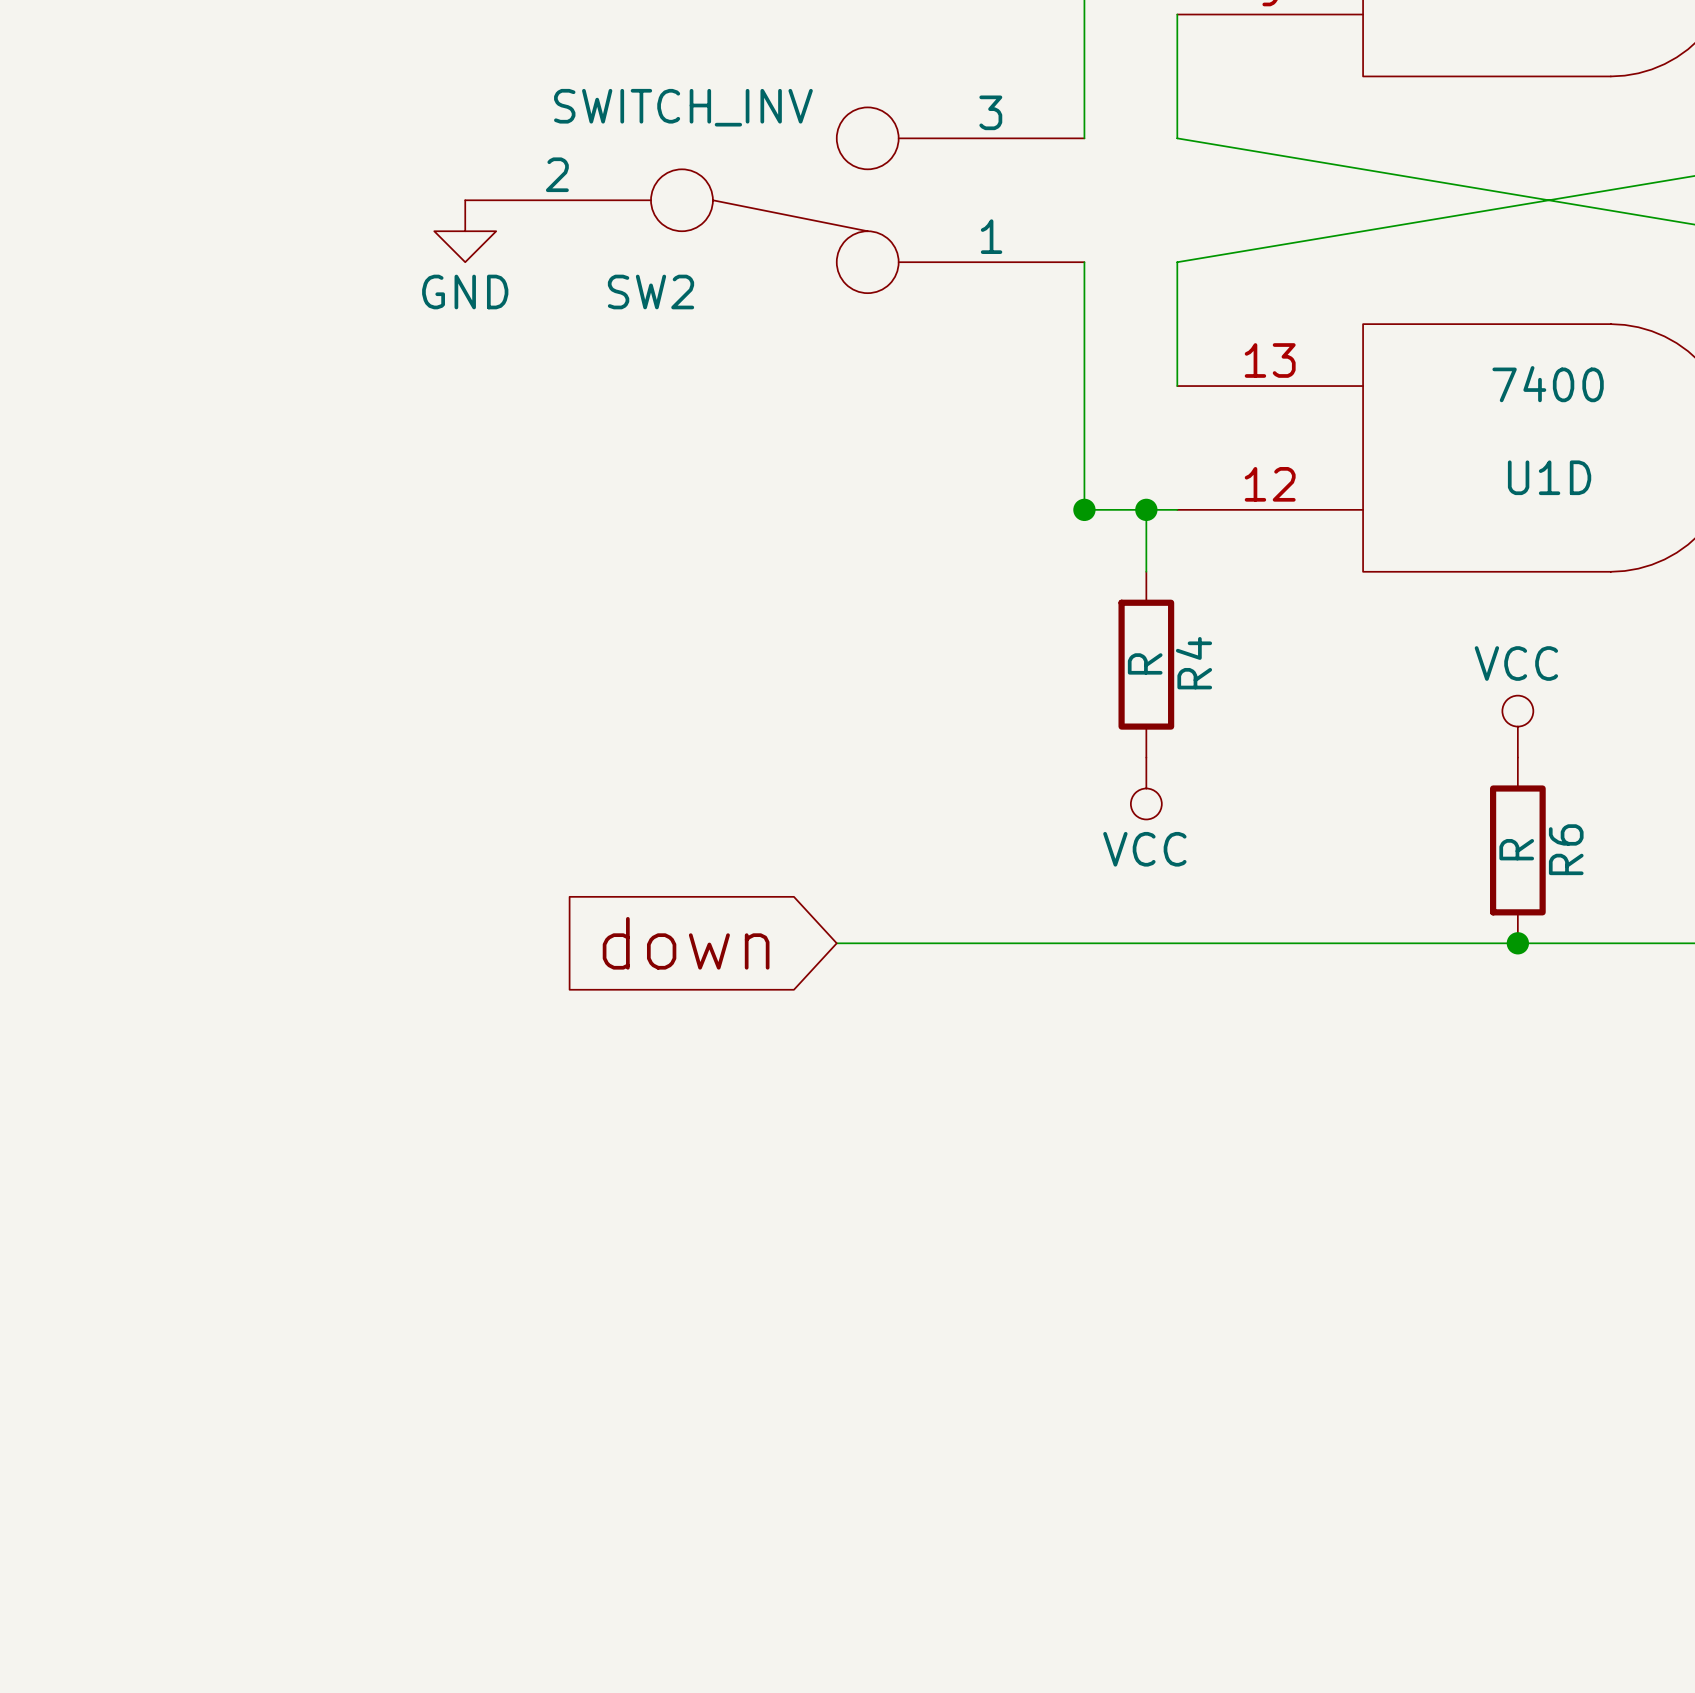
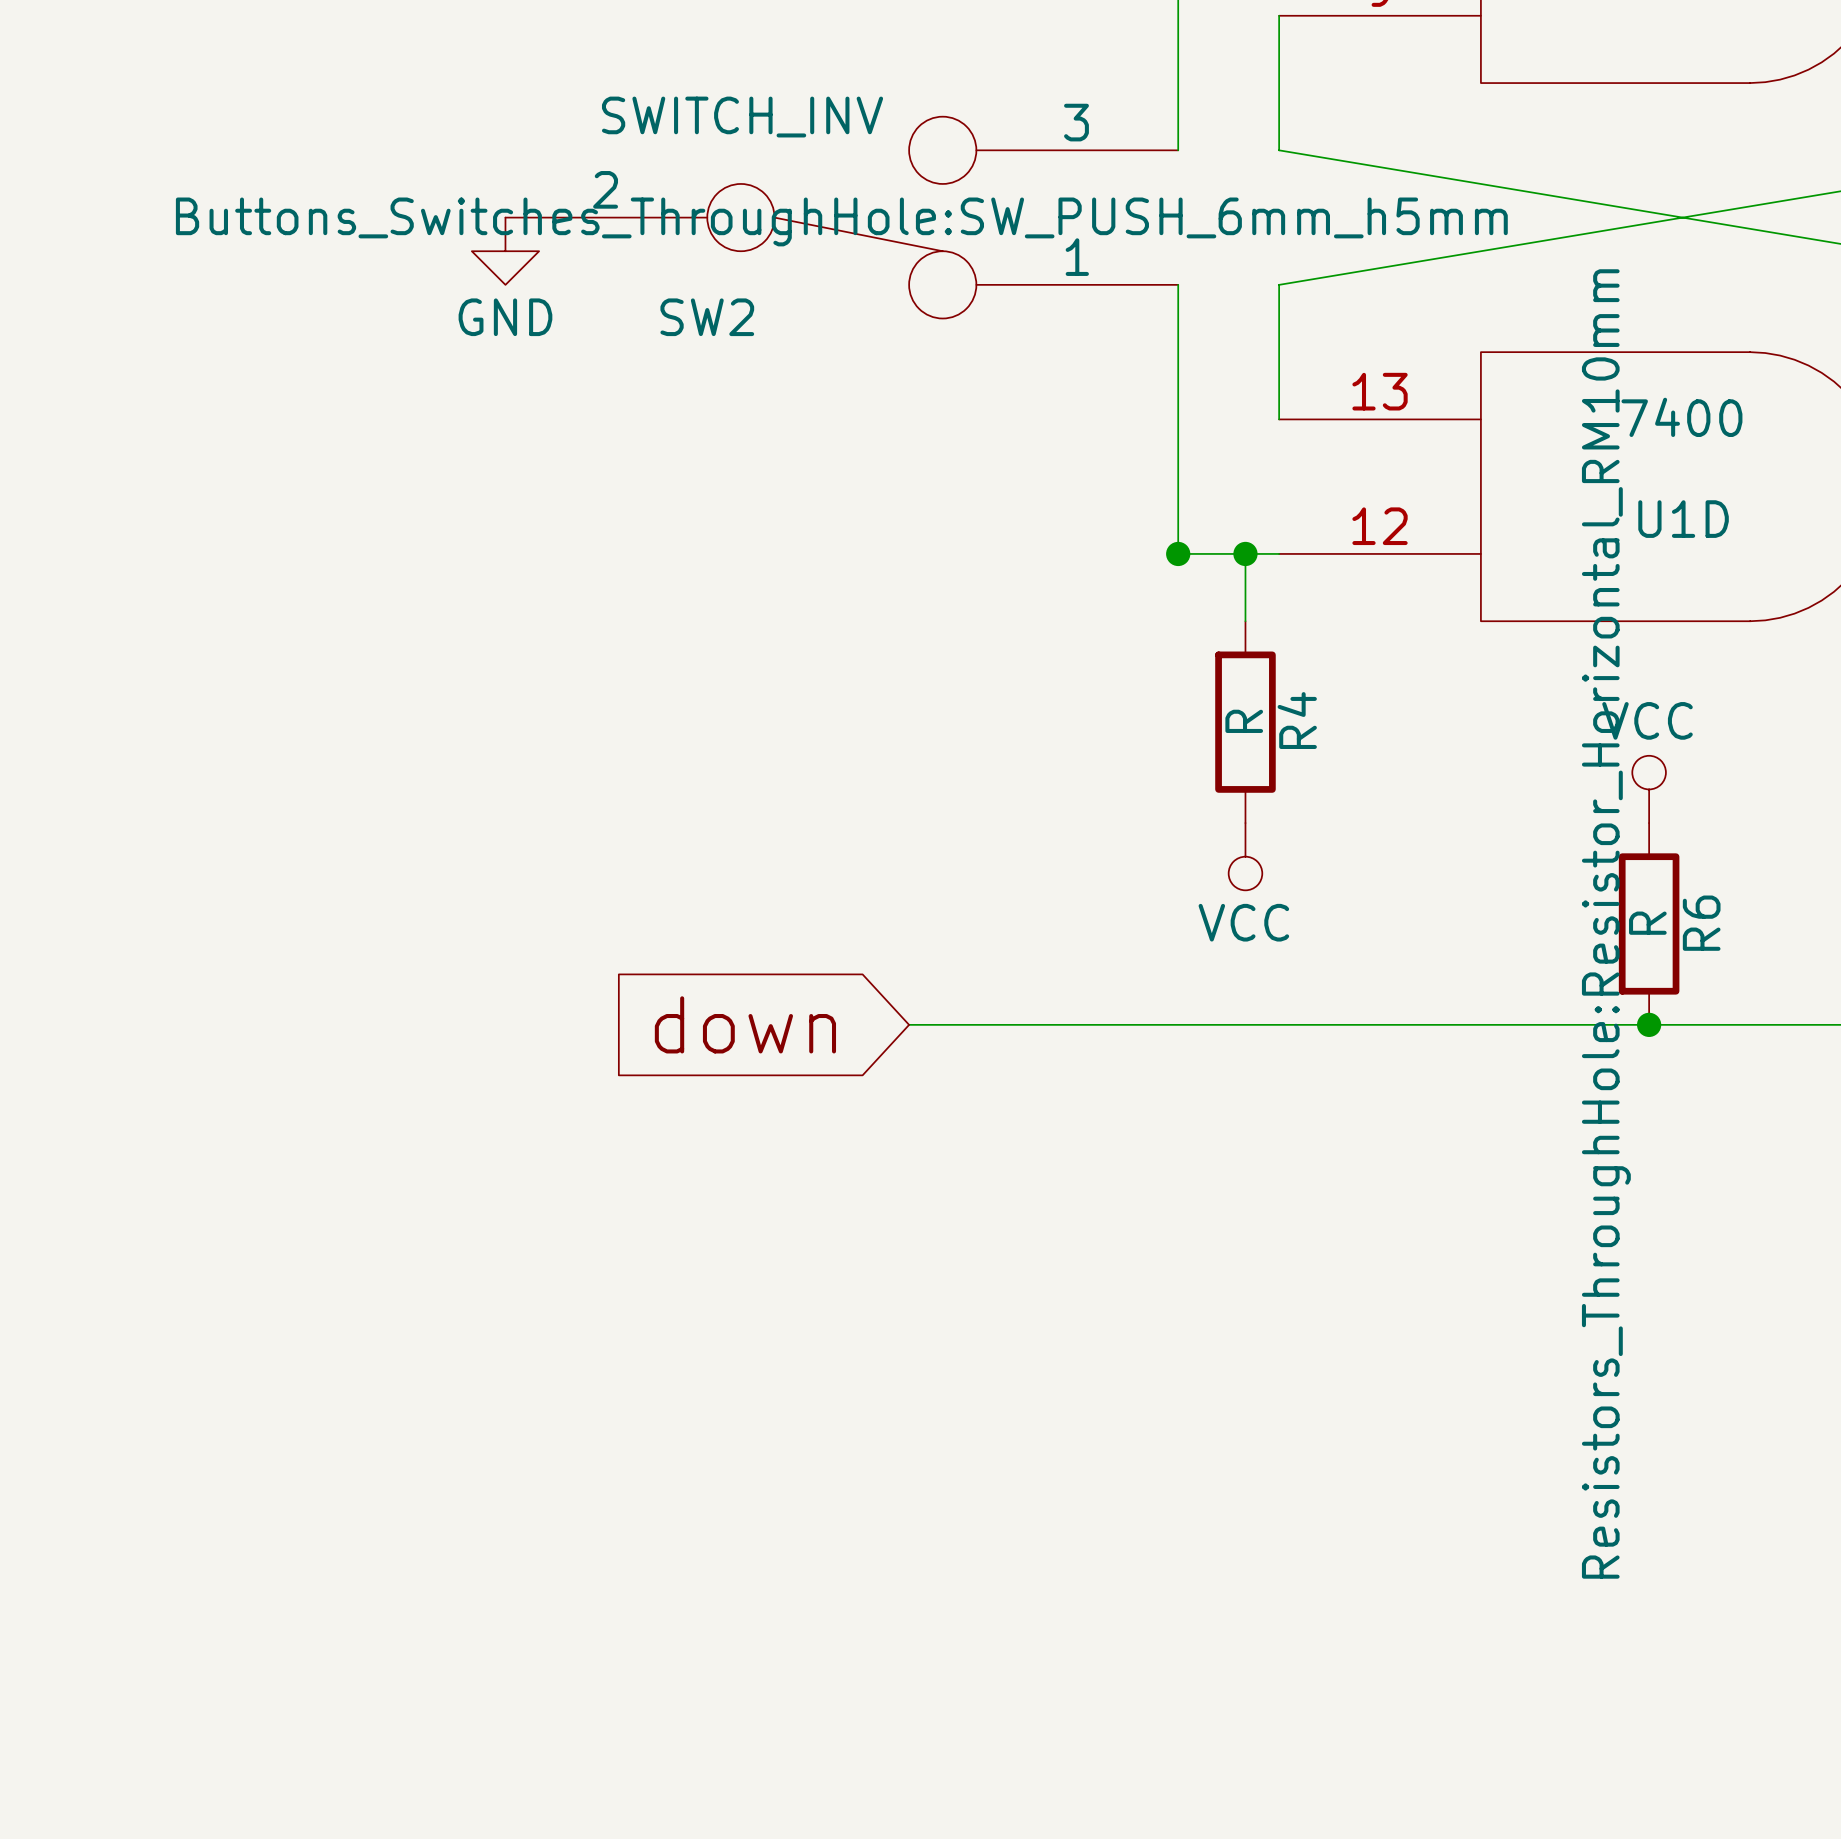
SW2 text: none -> Buttons_Switches_ThroughHole:SW_PUSH_6mm_h5mm (841, 221)
R6 text: none -> Resistors_ThroughHole:Resistor_Horizontal_RM10mm (1606, 923)

